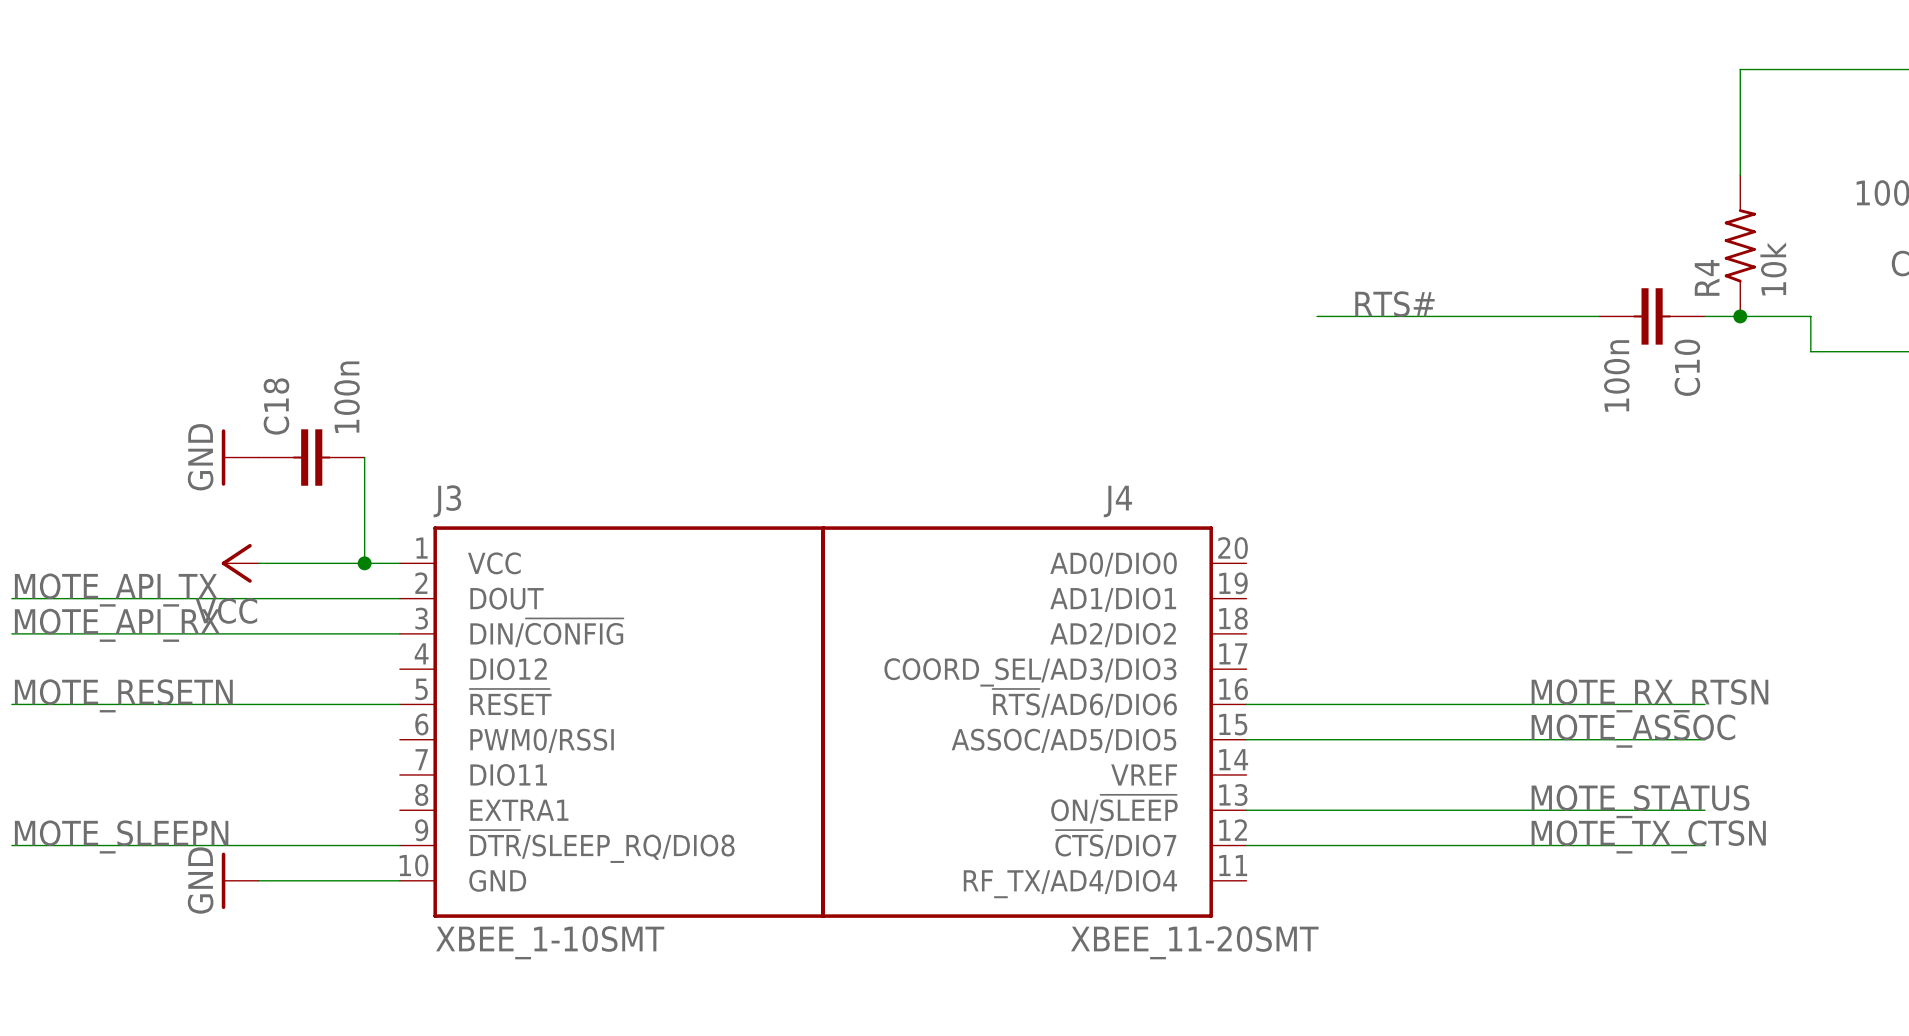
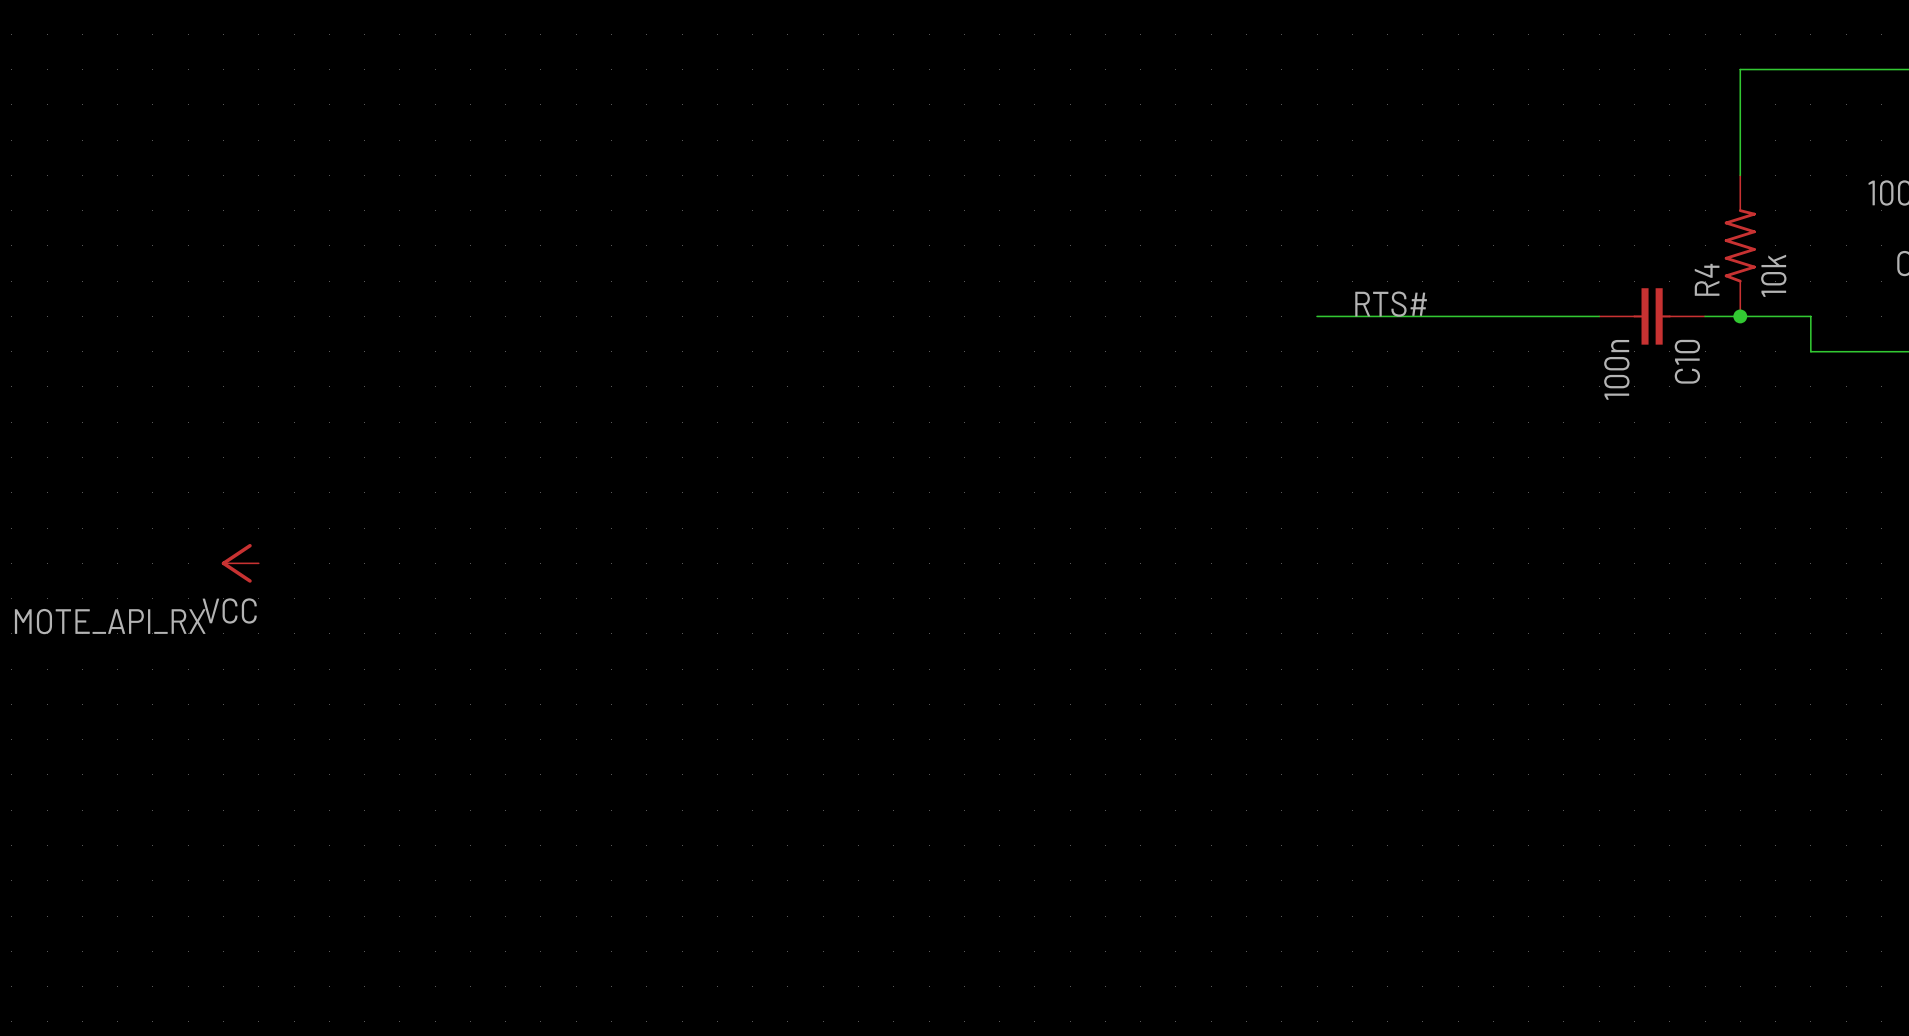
power symbol: GND (240, 457) -> none
C18: 100n (311, 457) -> none
wire: (364, 457) (364, 563) -> none
wire: (258, 563) (399, 563) -> none
junction: (364, 563) -> none
label: MOTE_API_TX (116, 590) -> none
wire: (11, 598) (399, 598) -> none
wire: (11, 633) (399, 633) -> none
label: MOTE_RESETN (123, 695) -> none
label: MOTE_RX_RTSN (1649, 695) -> none
wire: (11, 704) (399, 704) -> none
wire: (1246, 704) (1705, 704) -> none
J3: XBEE_1-10SMT (612, 722) -> none
J4: XBEE_11-20SMT (1033, 722) -> none
label: MOTE_ASSOC (1633, 731) -> none
wire: (1246, 739) (1705, 739) -> none
label: MOTE_STATUS (1640, 801) -> none
wire: (1246, 810) (1705, 810) -> none
label: MOTE_SLEEPN (121, 836) -> none
label: MOTE_TX_CTSN (1648, 836) -> none
wire: (11, 845) (399, 845) -> none
wire: (1246, 845) (1705, 845) -> none
power symbol: GND (240, 880) -> none
wire: (258, 880) (399, 880) -> none

